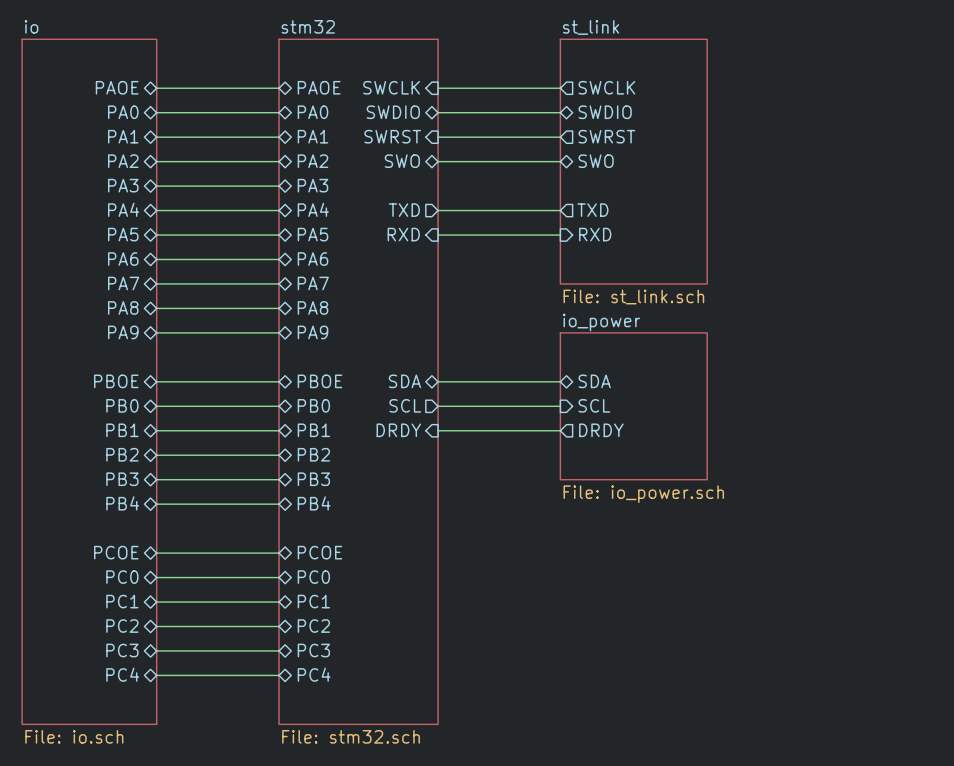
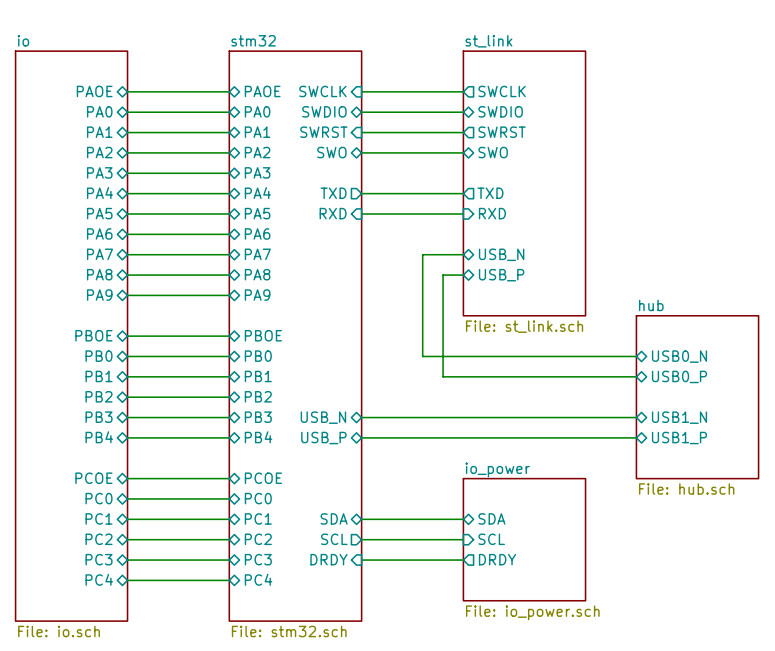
sheet st_link: File: st_link.sch (633, 161) -> none
sheet st_link: none -> File: st_link.sch (524, 183)
sheet pin: none -> USB_N (501, 254)
sheet pin: none -> USB_P (501, 275)
sheet pin: SDA (404, 381) -> none
wire: (438, 381) (560, 381) -> (361, 519) (463, 519)
sheet pin: SDA (594, 381) -> none
sheet pin: SCL (405, 405) -> none
sheet pin: SCL (594, 405) -> none
wire: (438, 406) (511, 406) -> (463, 254) (422, 254) (422, 356)
wire: none -> (463, 356) (636, 356)
sheet io_power position: (633, 406) -> (524, 539)
sheet pin: none -> USB0_N (679, 356)
sheet pin: DRDY (398, 430) -> none
wire: (438, 430) (535, 430) -> (463, 275) (443, 275) (443, 376)
wire: none -> (463, 376) (636, 376)
sheet pin: DRDY (601, 430) -> none
sheet pin: none -> USB0_P (679, 376)
sheet hub: none -> File: hub.sch (697, 397)
sheet pin: none -> USB_N (323, 417)
wire: none -> (361, 417) (636, 417)
sheet pin: none -> USB1_N (679, 417)
sheet pin: none -> USB_P (323, 438)
wire: none -> (361, 437) (636, 437)
sheet pin: none -> USB1_P (679, 438)
sheet pin: none -> SDA (334, 518)
sheet pin: none -> SDA (491, 518)
sheet pin: none -> SCL (334, 539)
wire: none -> (361, 539) (463, 539)
sheet pin: none -> SCL (491, 539)
sheet pin: none -> DRDY (328, 559)
wire: none -> (361, 560) (463, 560)
sheet pin: none -> DRDY (497, 559)

